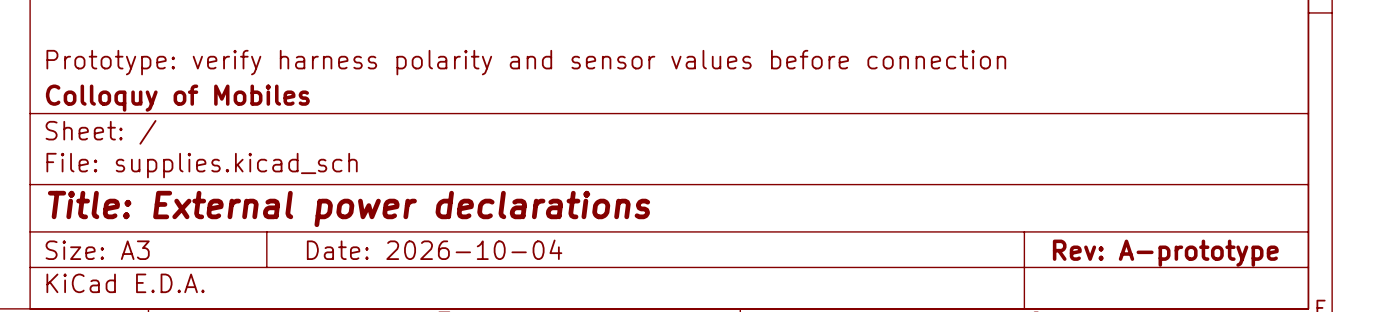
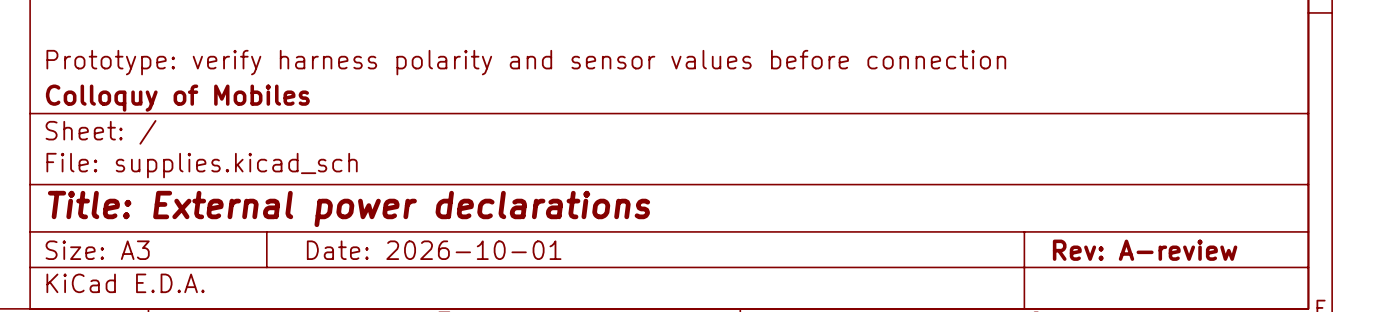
title block: Date: 2026-10-04 (434, 249) -> Date: 2026-10-01 (434, 250)
title block: Rev: A-prototype (1165, 253) -> Rev: A-review (1145, 250)

